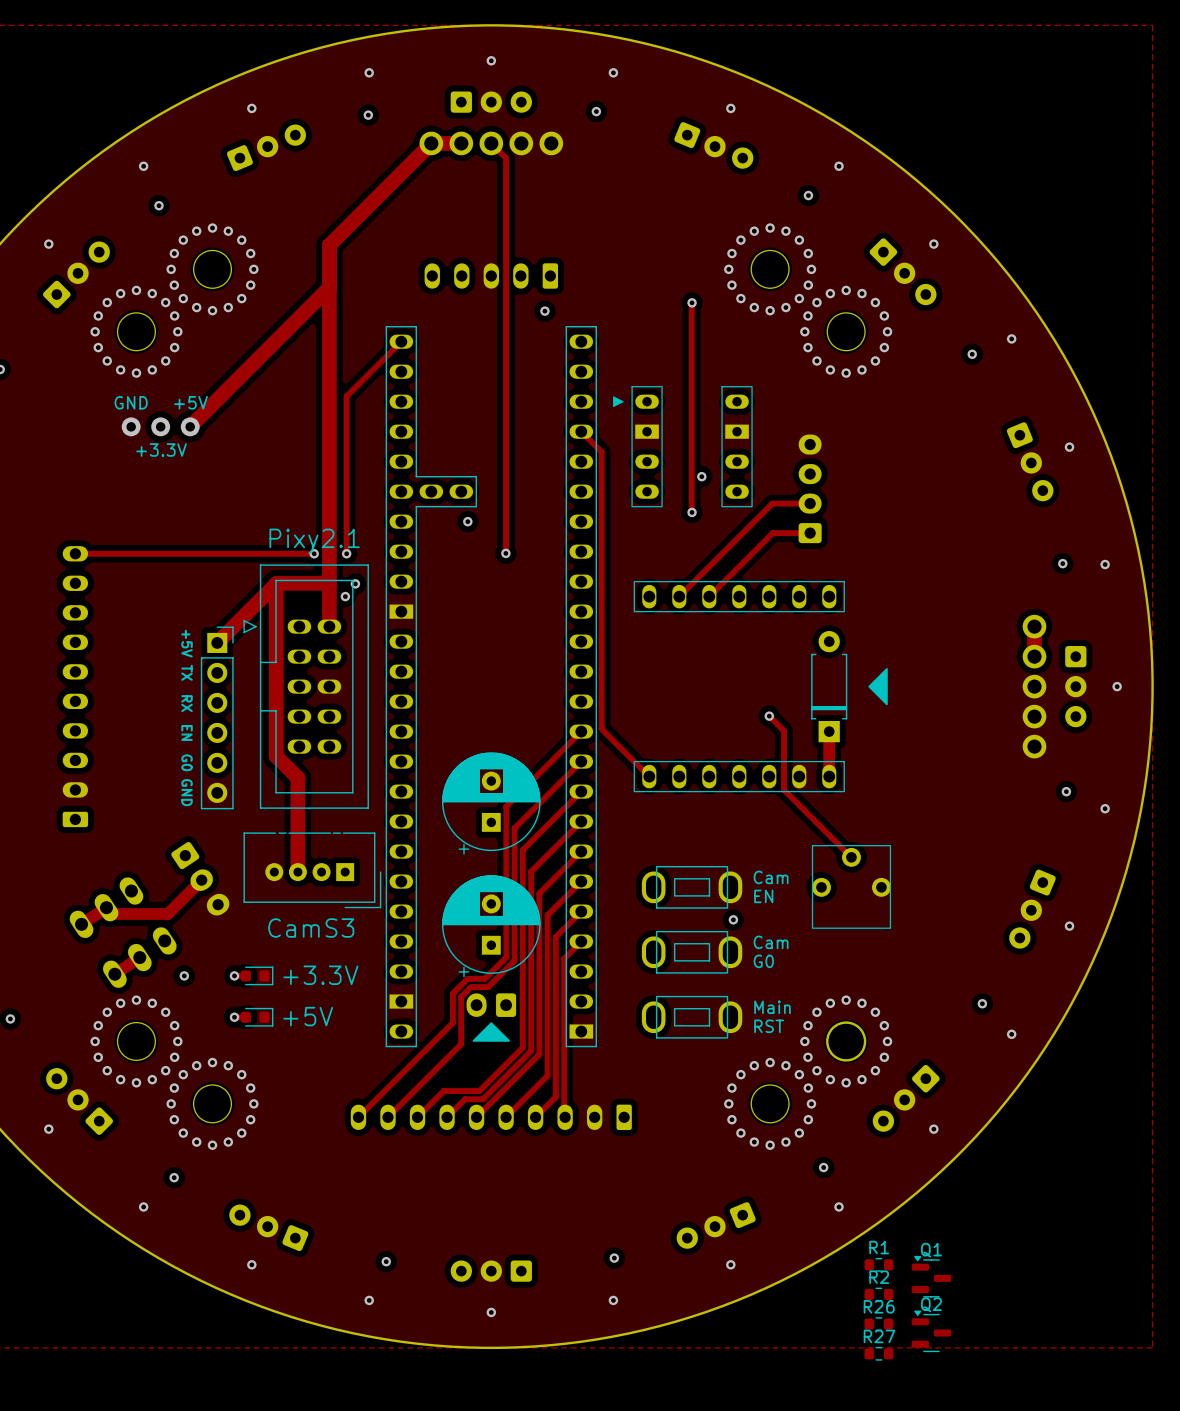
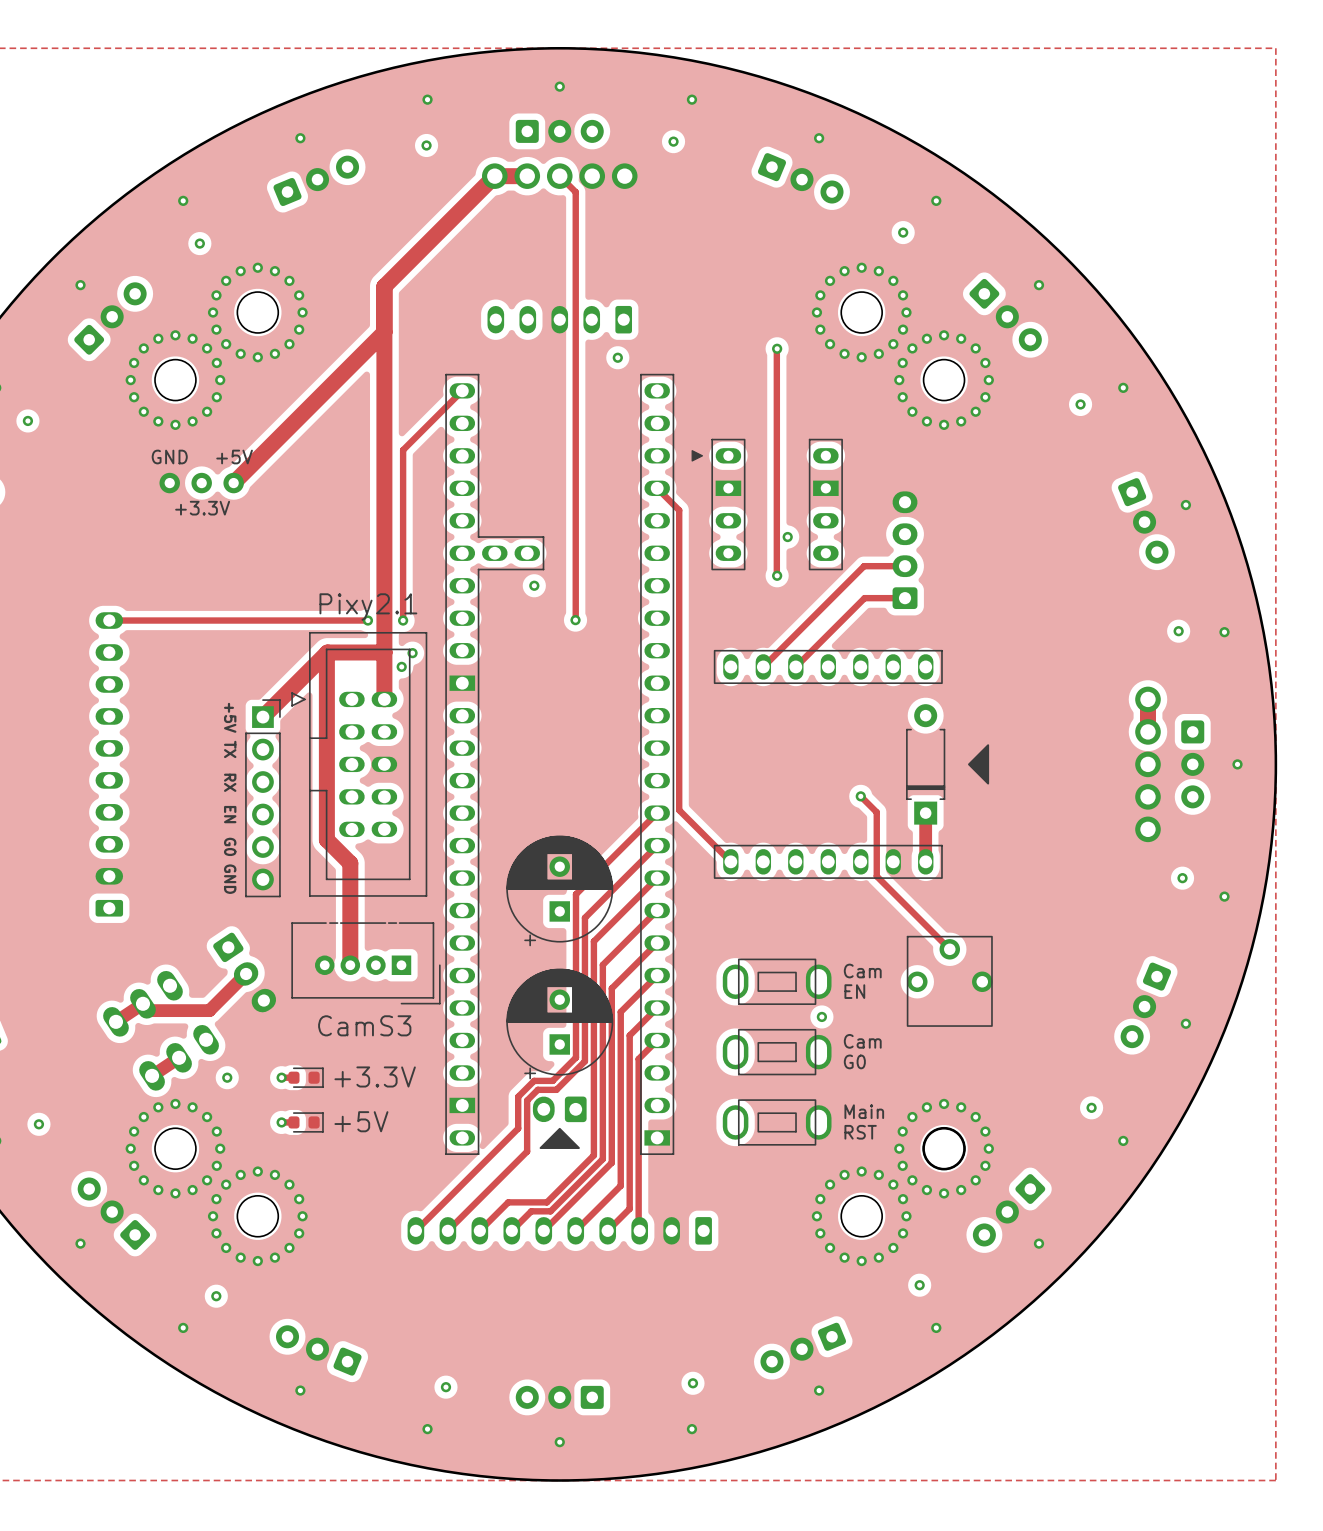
R1: (878, 1264) -> none
Q1: (931, 1276) -> none
R2: (878, 1294) -> none
R26: (878, 1324) -> none
Q2: (931, 1331) -> none
R27: (878, 1353) -> none

